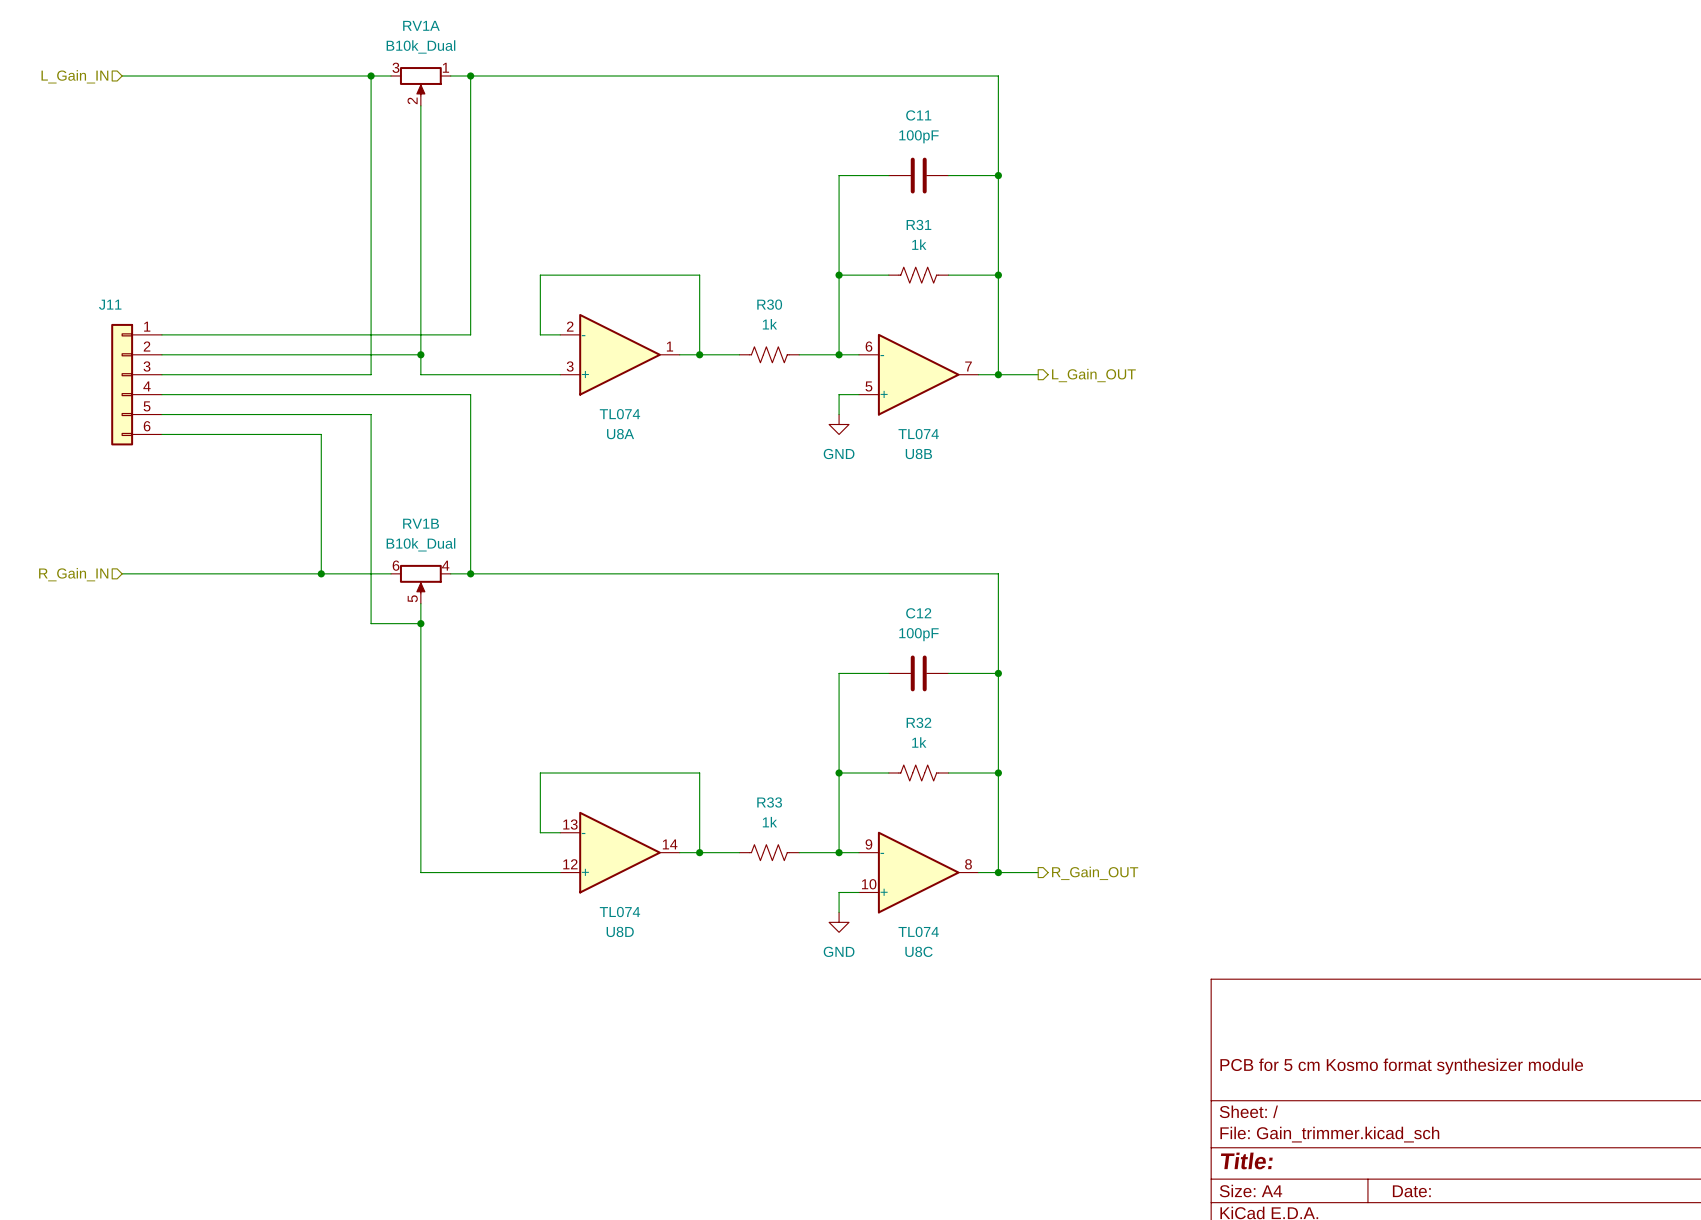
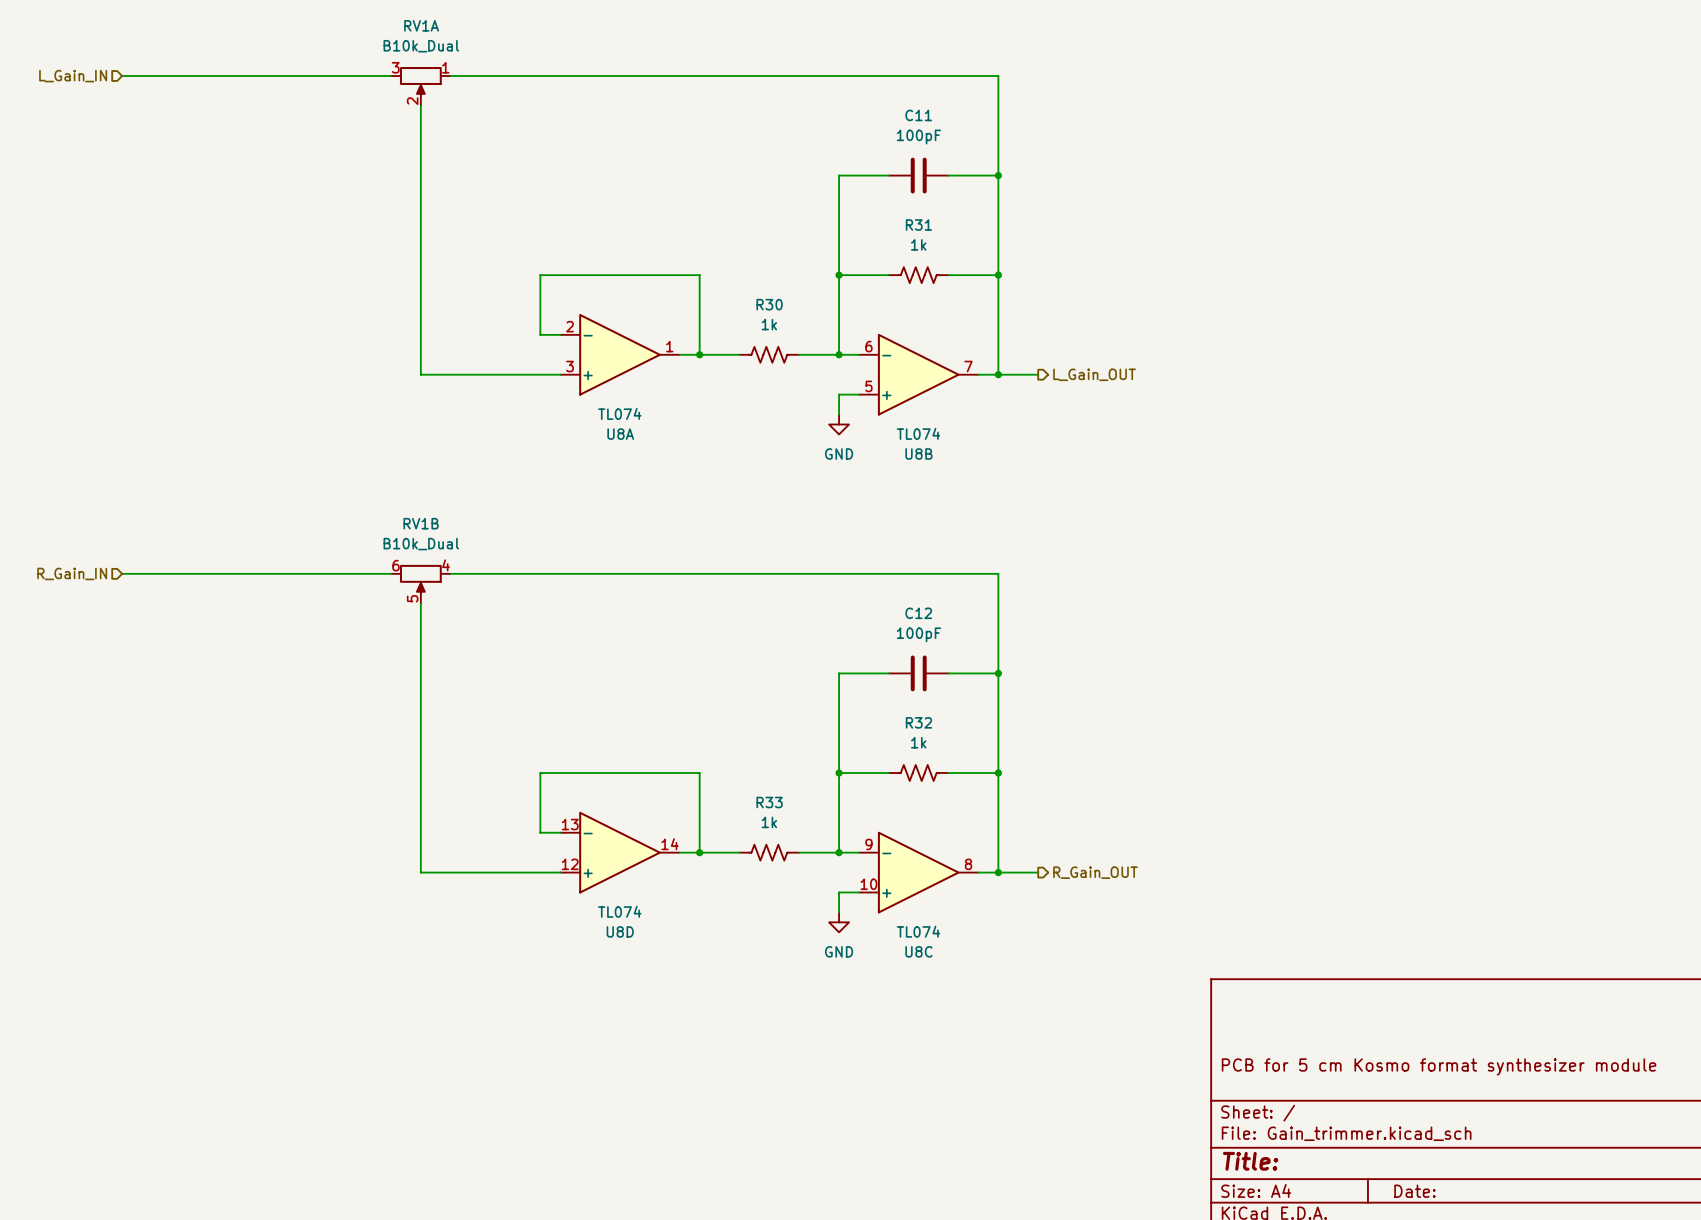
wire: (371, 76) (371, 374) (161, 374) -> none
junction: (371, 76) -> none
wire: (470, 76) (470, 334) (161, 334) -> none
junction: (470, 76) -> none
wire: (161, 354) (420, 354) -> none
junction: (420, 354) -> none
J11: (136, 384) -> none
wire: (161, 394) (470, 394) (470, 573) -> none
wire: (161, 414) (371, 414) (371, 623) (420, 623) -> none
wire: (161, 434) (321, 434) (321, 573) -> none
junction: (321, 573) -> none
junction: (470, 573) -> none
junction: (420, 623) -> none

